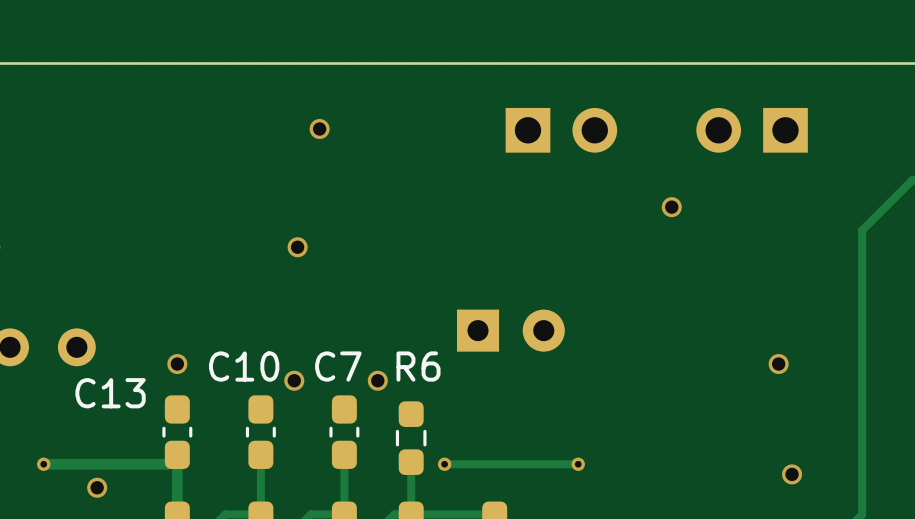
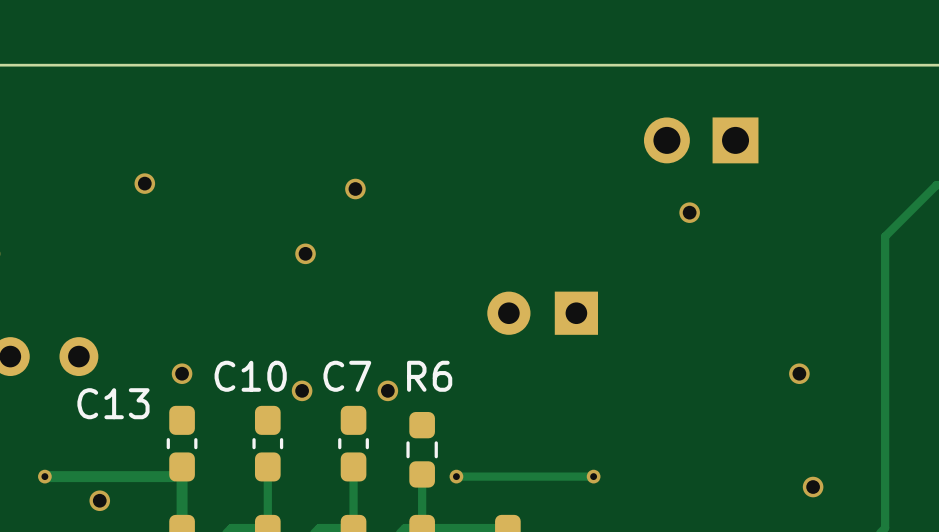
via position: (319, 128) -> (355, 189)
part: (561, 130) -> none
part: (752, 130) -> none
part: none -> (701, 140)
via: none -> (144, 183)
part rotation: 0° (510, 330) -> 180° (542, 313)

